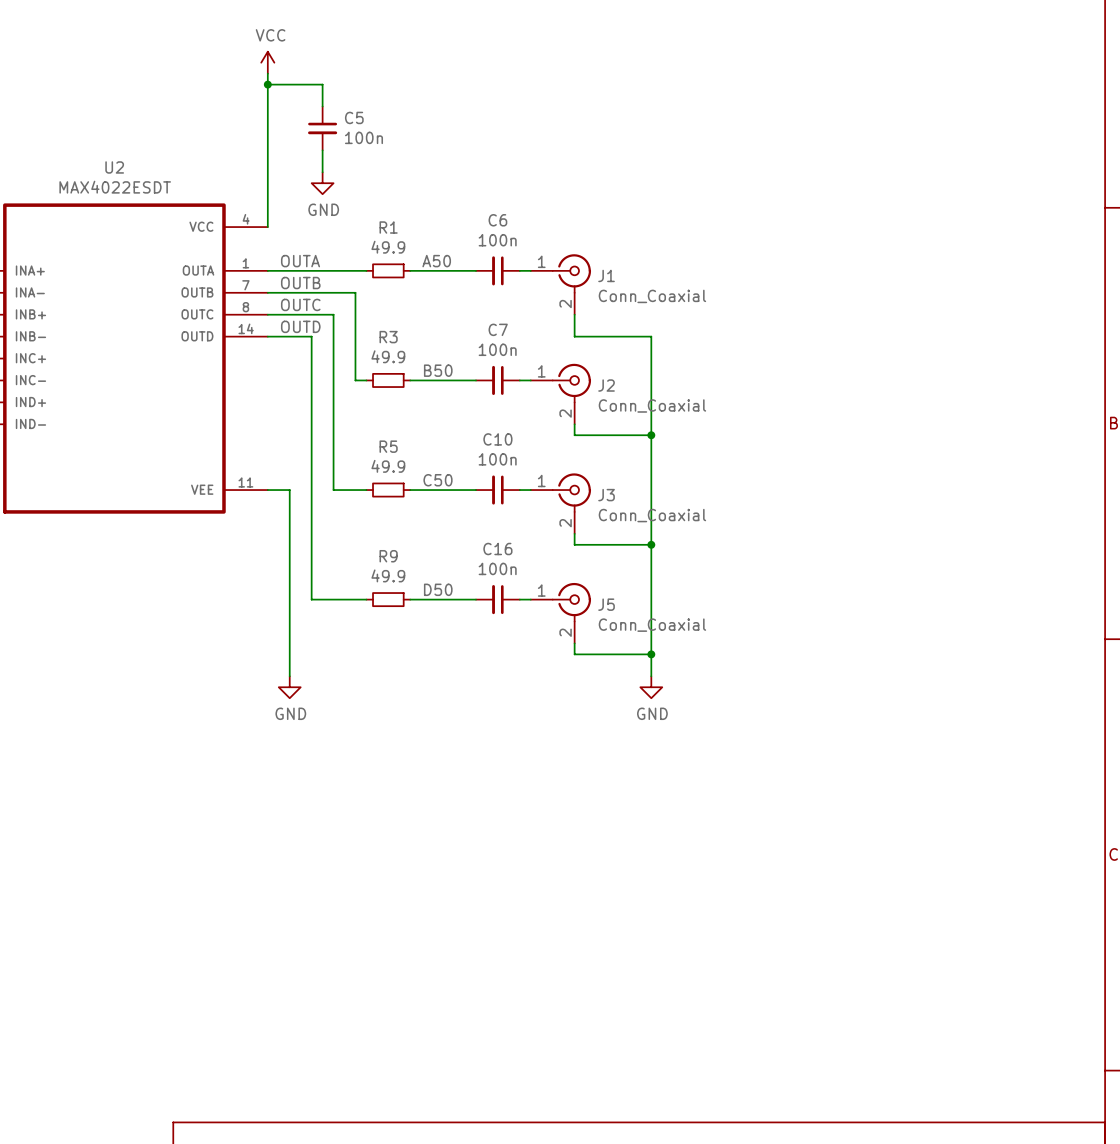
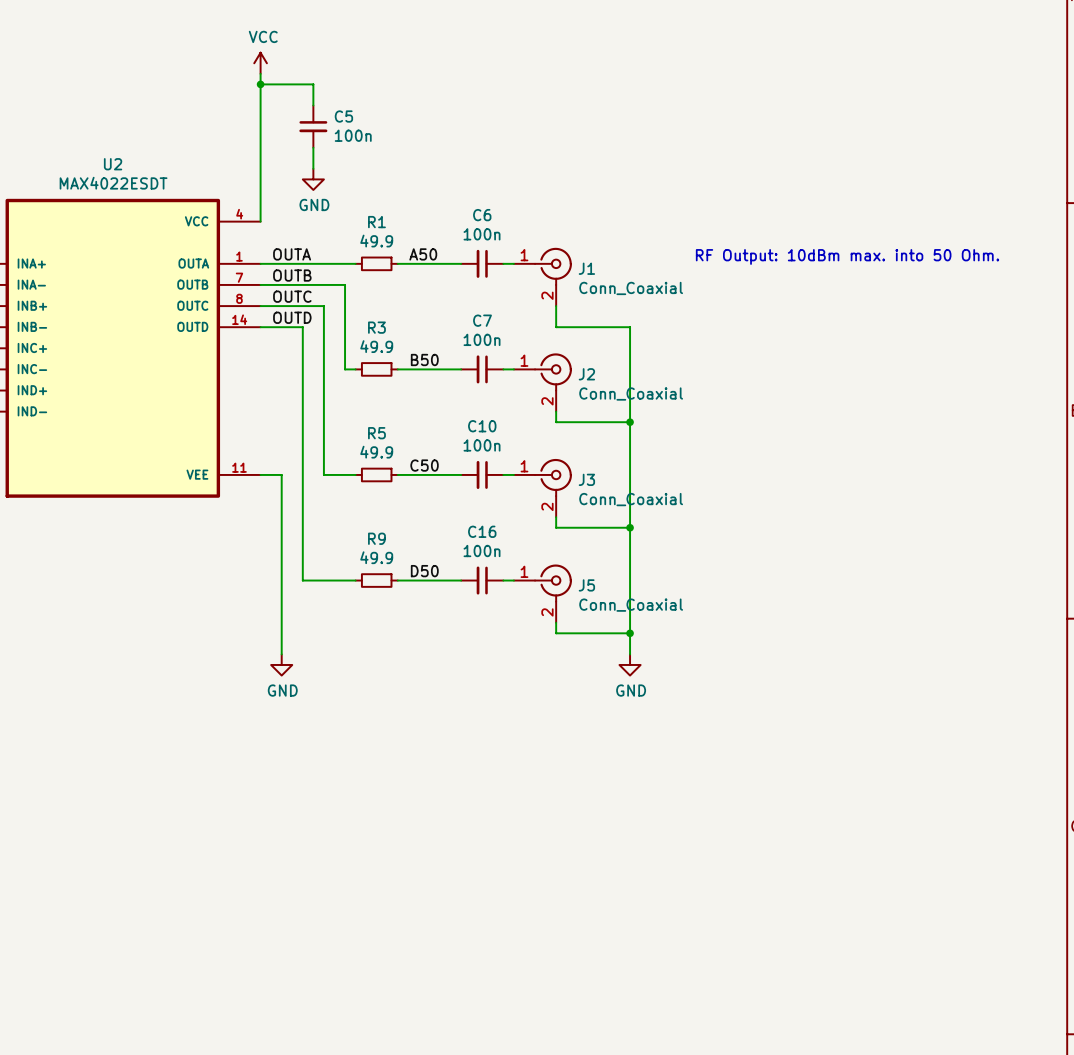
text: none -> RF Output: 10dBm max. into 50 Ohm. (847, 256)

